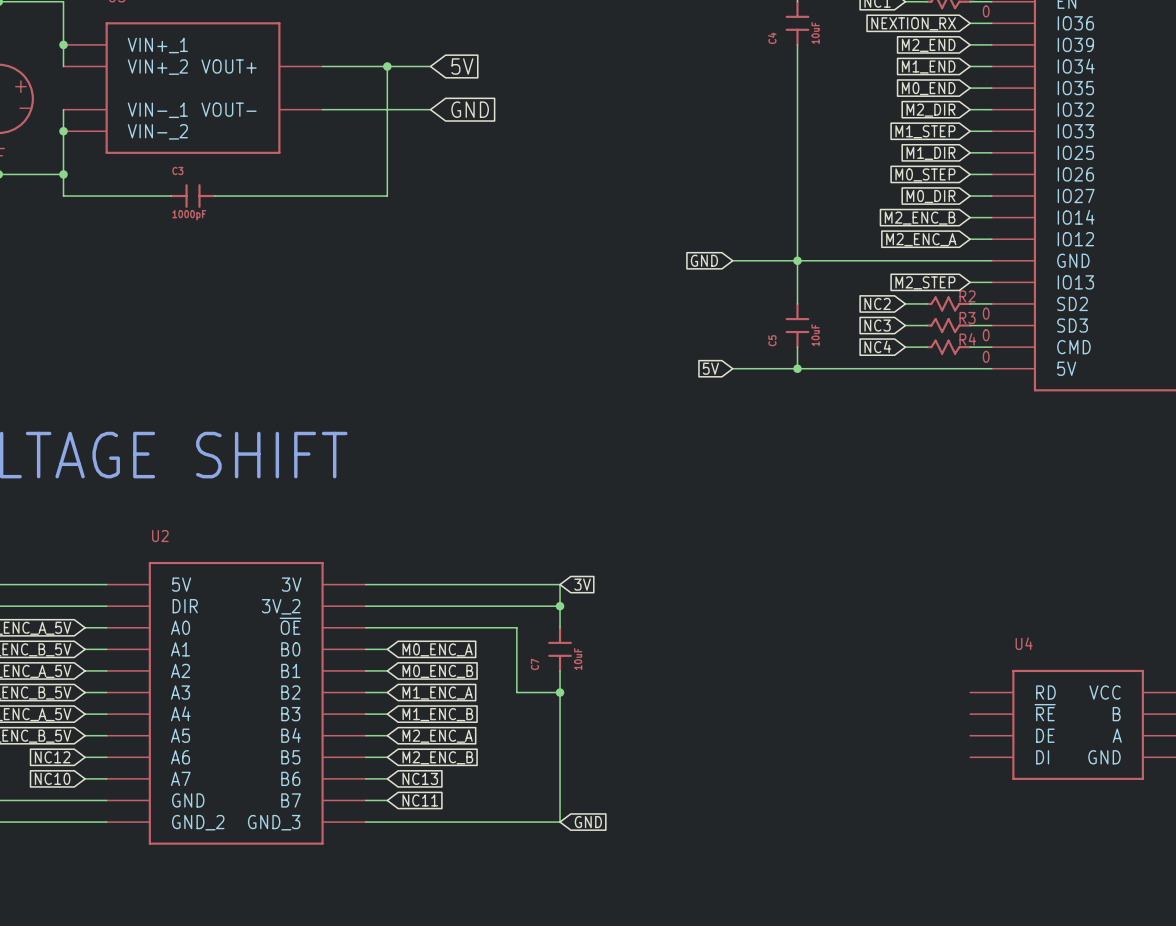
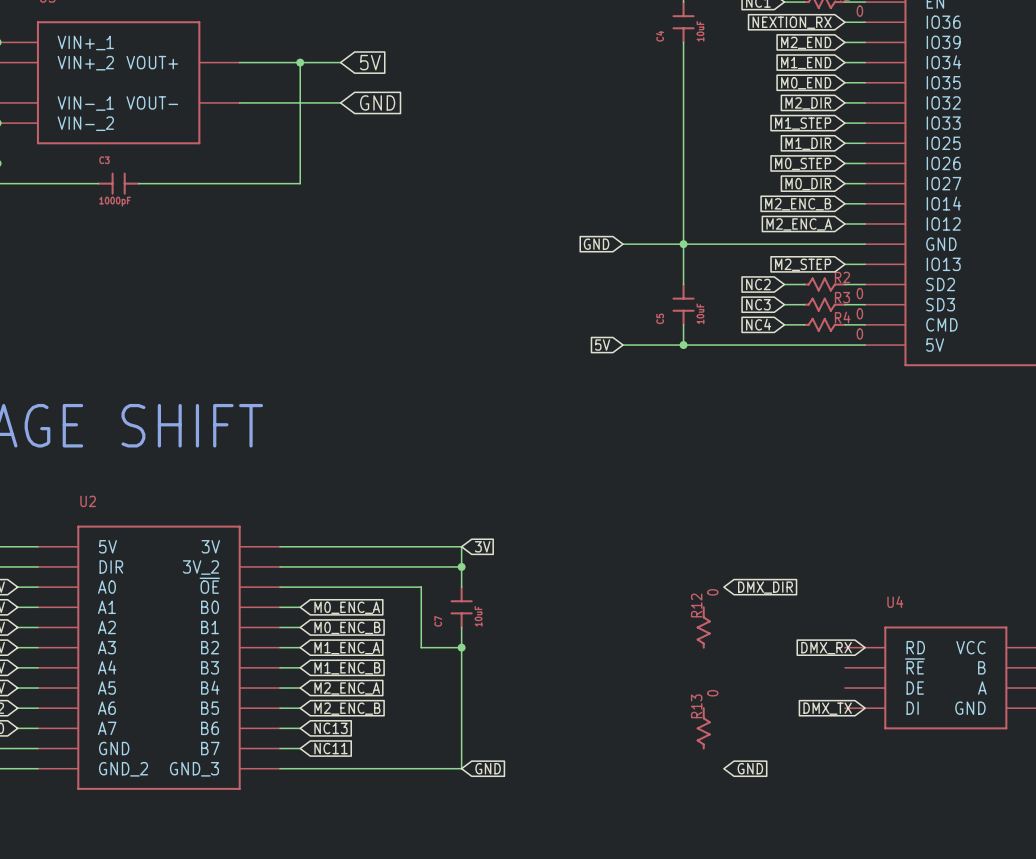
global label: none -> DMX_DIR (765, 587)
R12: none -> 0 (703, 627)
global label: none -> DMX_RX (826, 648)
global label: none -> DMX_TX (827, 708)
R13: none -> 0 (703, 728)
global label: none -> GND (750, 768)

